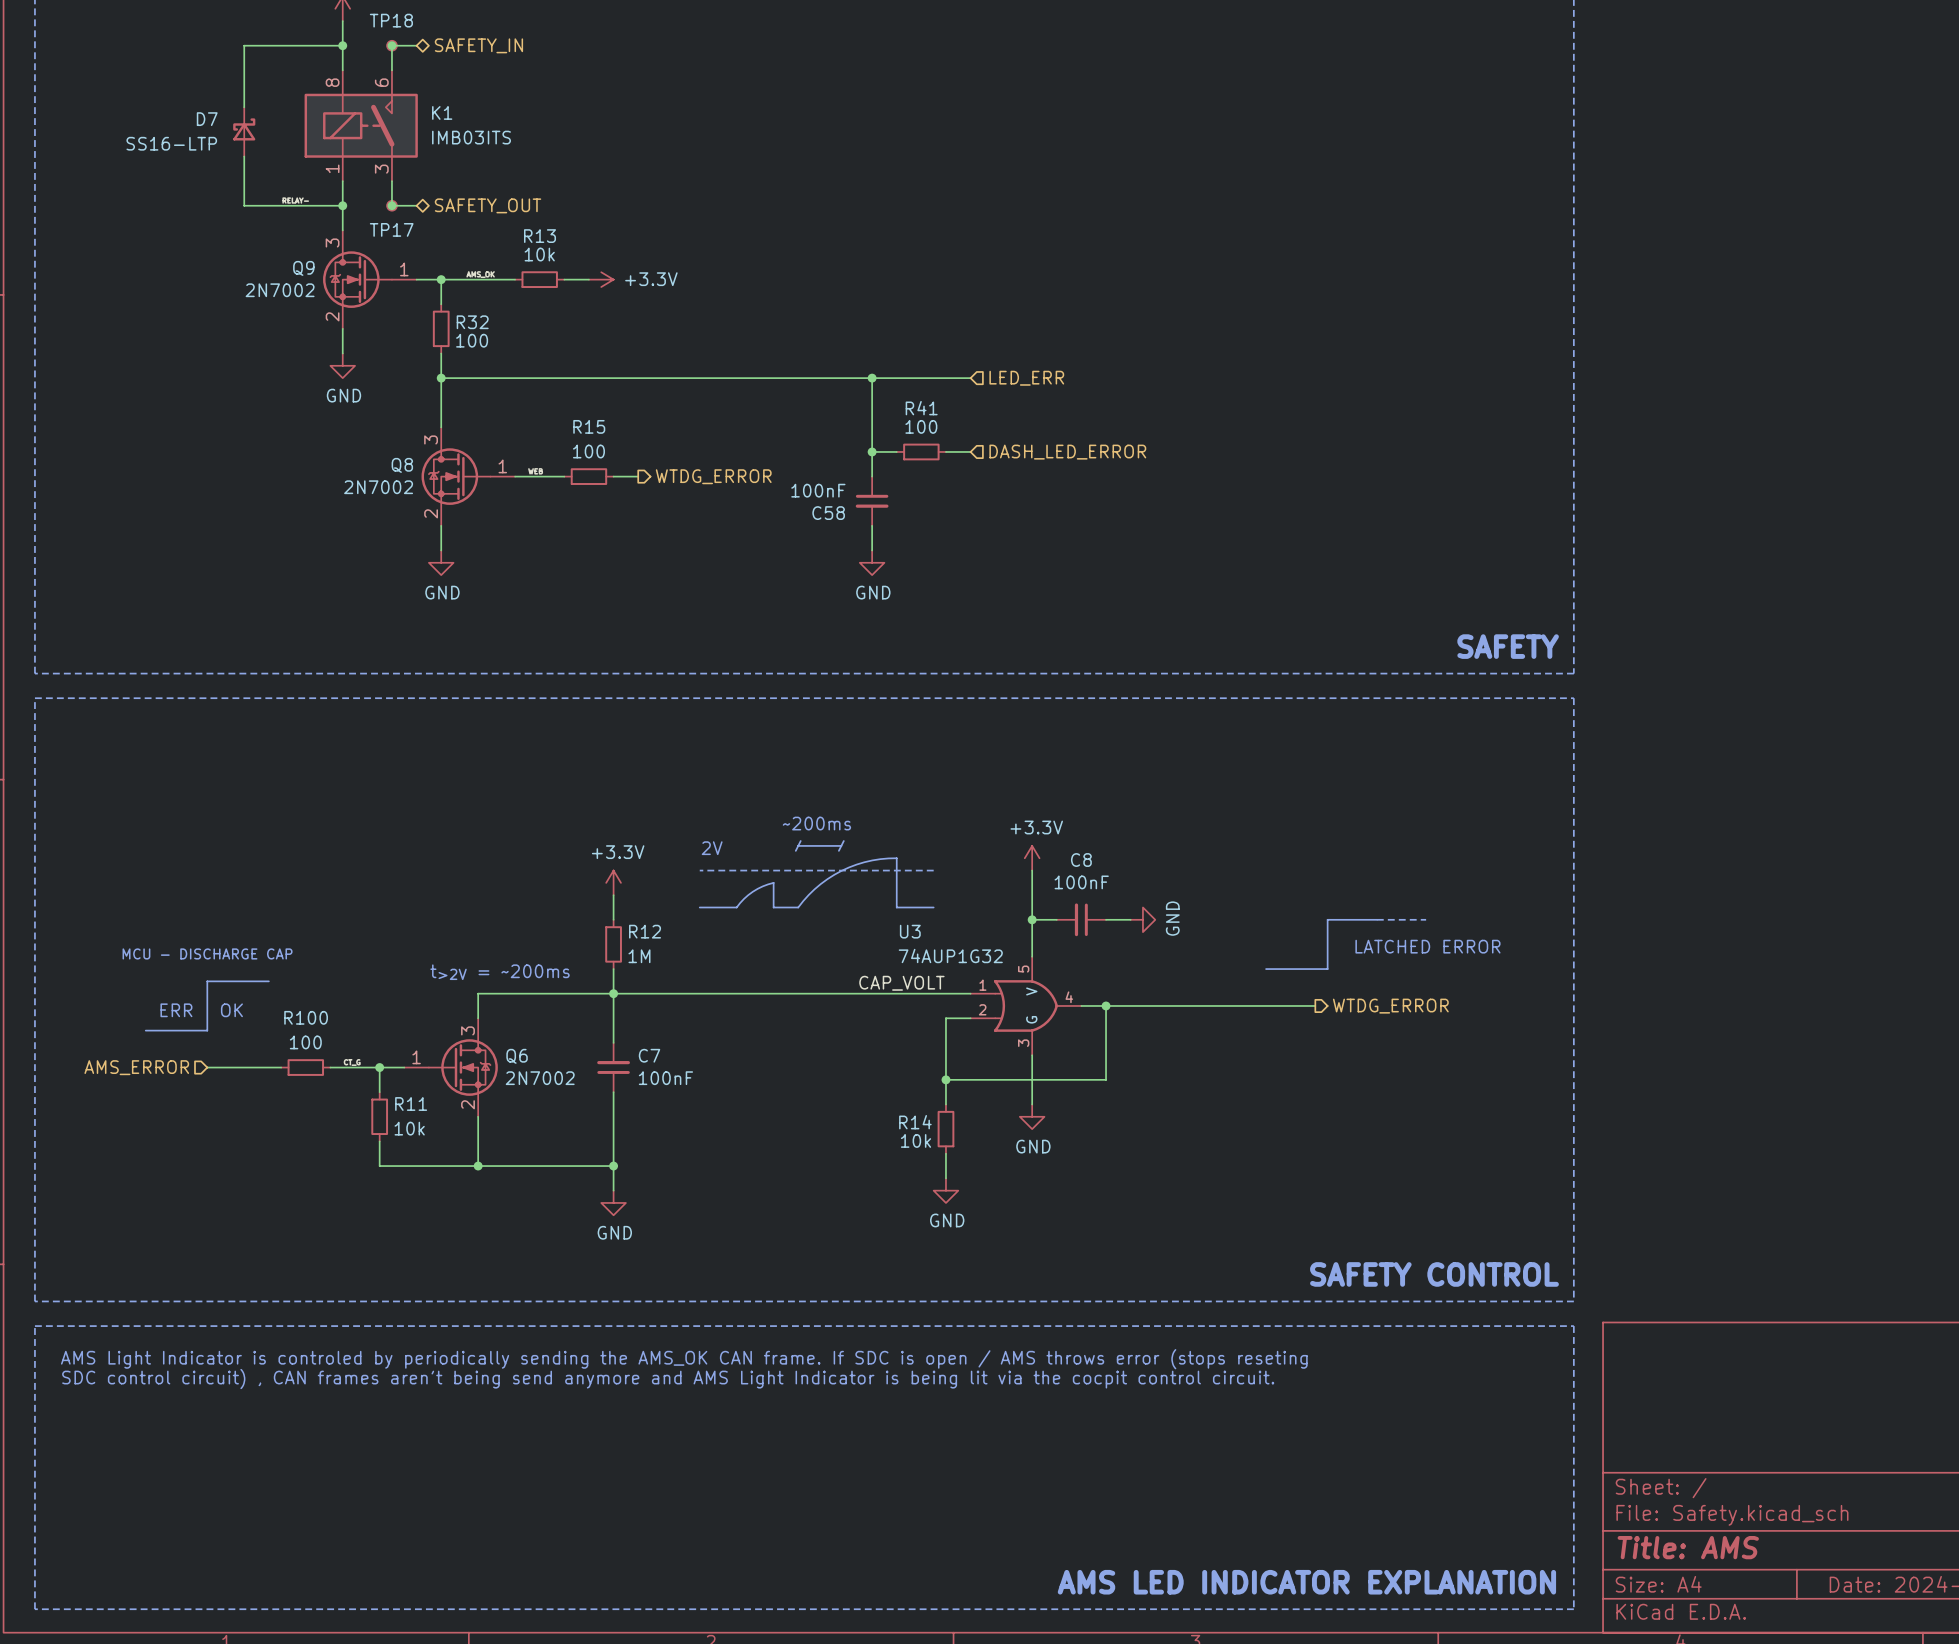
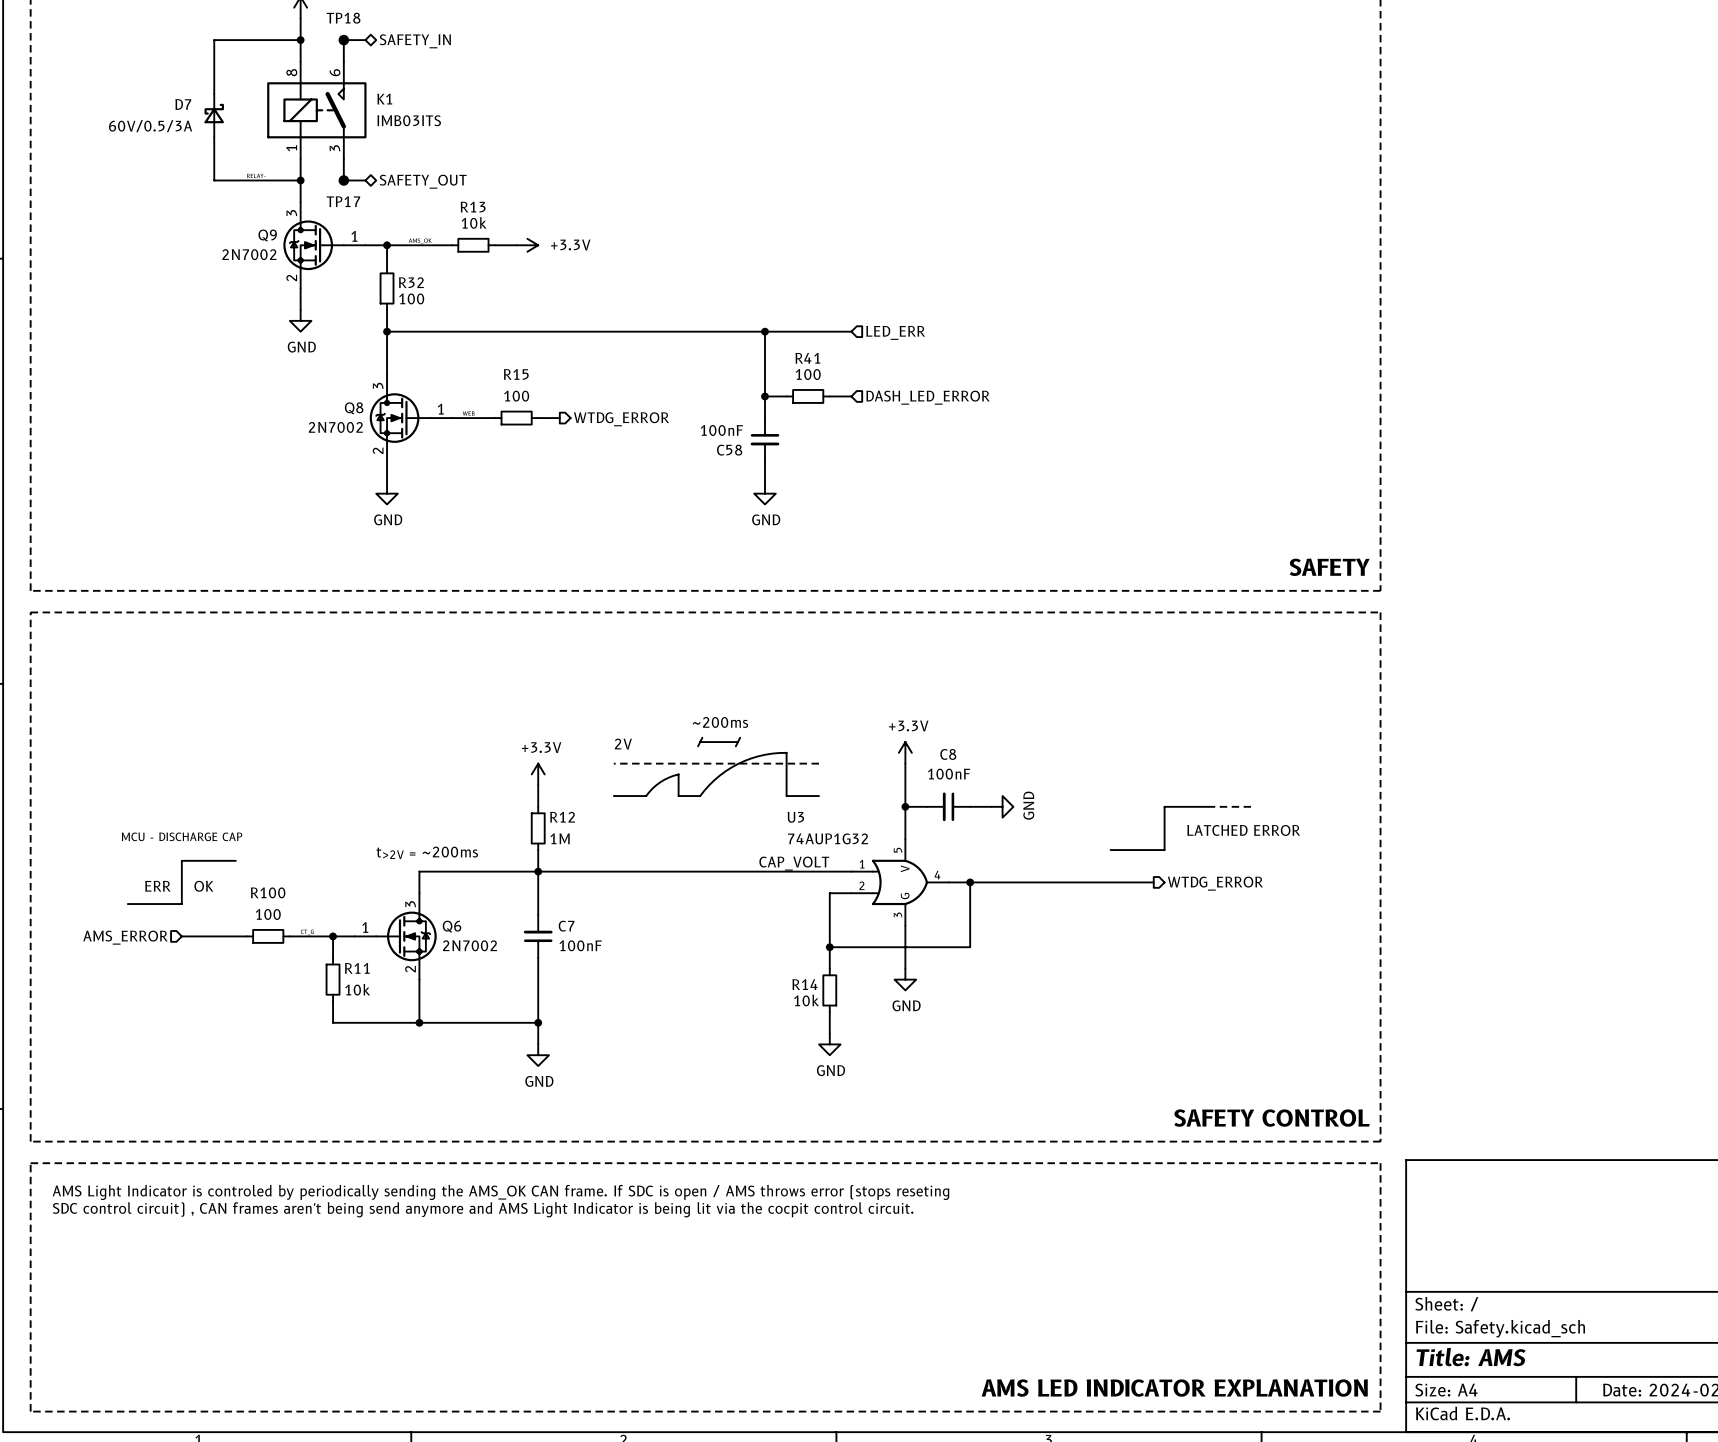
D7 value: SS16-LTP (171, 143) -> 60V/0.5/3A (150, 126)

